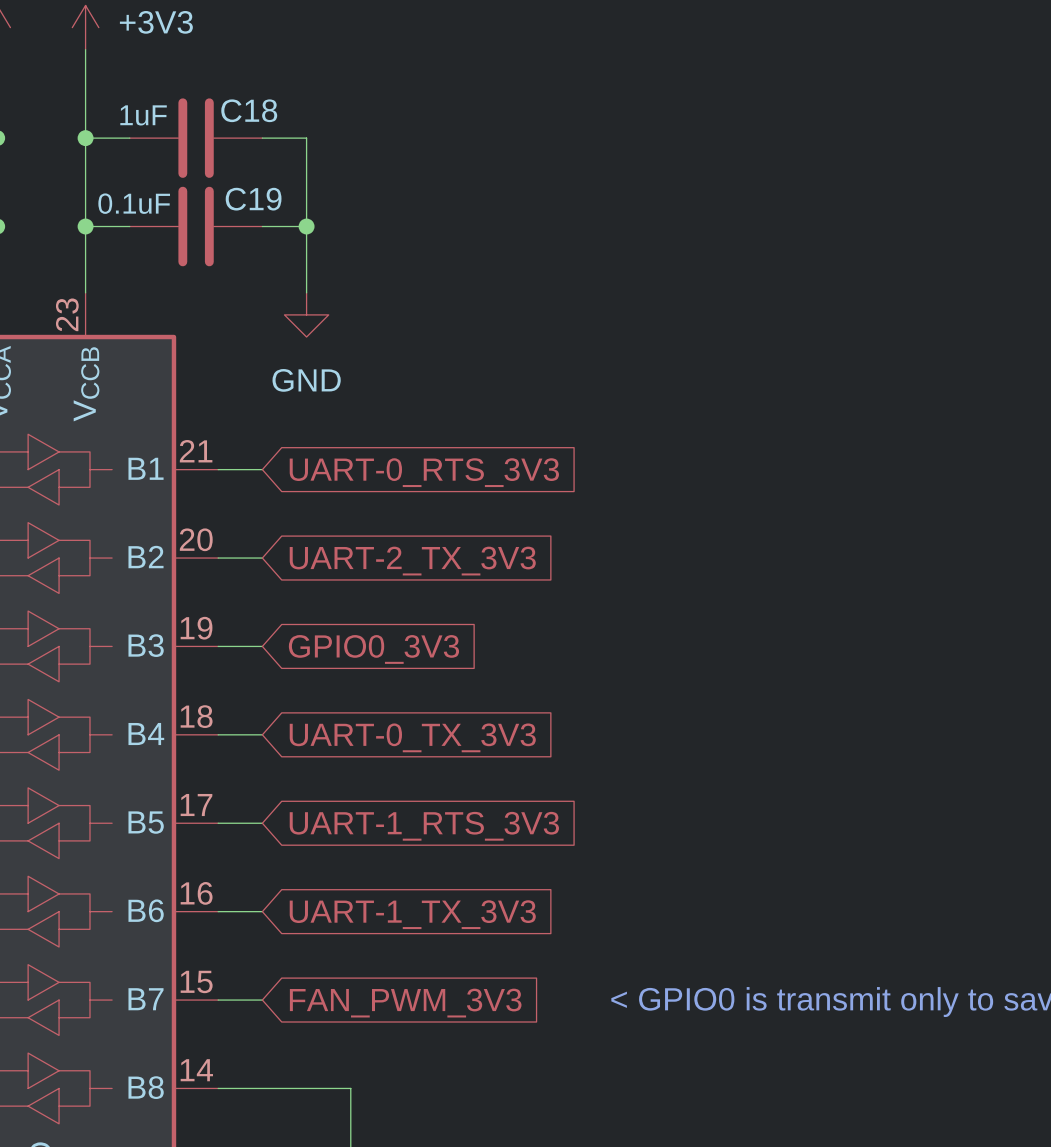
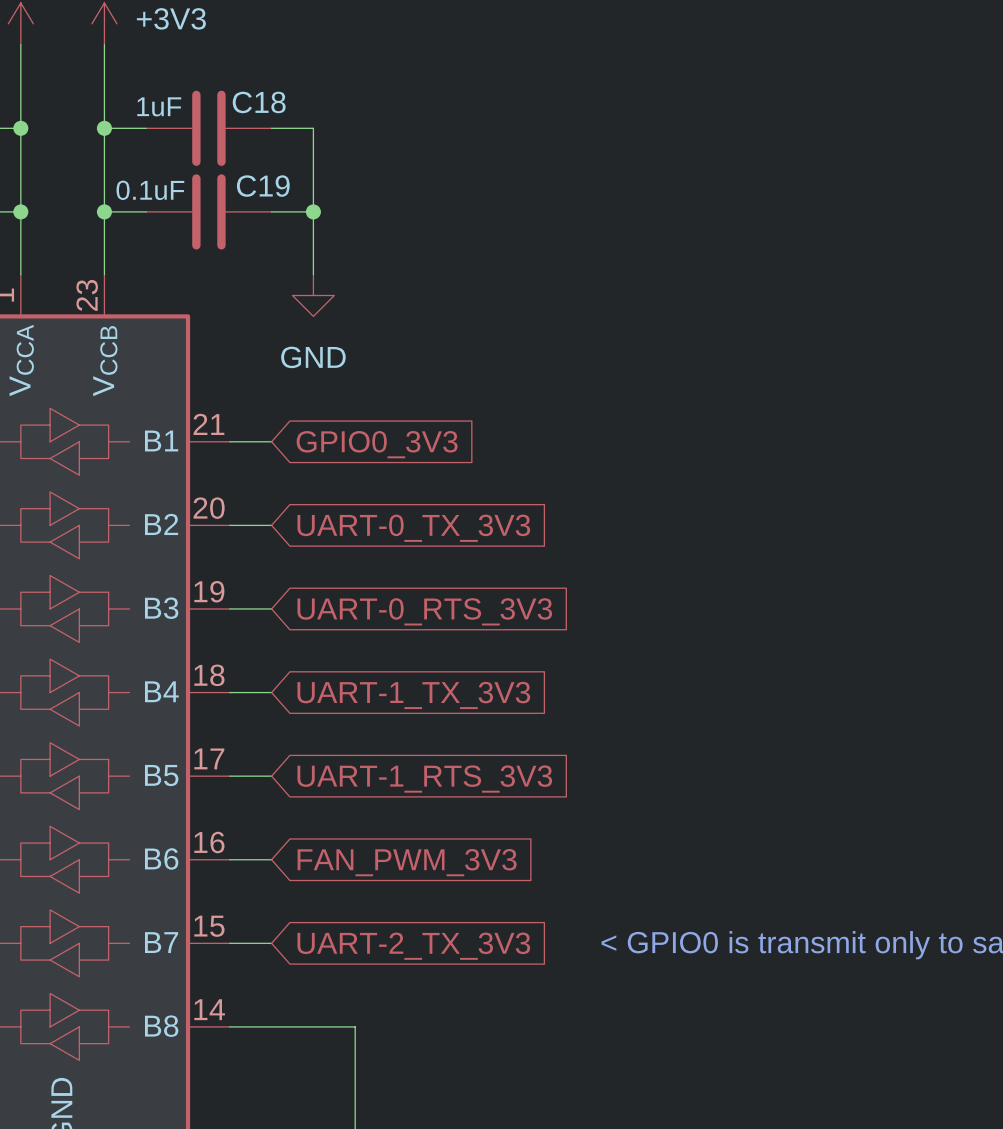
global label: UART-0_RTS_3V3 (424, 472) -> GPIO0_3V3 (377, 444)
global label: UART-2_TX_3V3 (412, 561) -> UART-0_TX_3V3 (413, 528)
global label: GPIO0_3V3 (373, 649) -> UART-0_RTS_3V3 (424, 611)
global label: UART-0_TX_3V3 (412, 737) -> UART-1_TX_3V3 (413, 695)
global label: UART-1_TX_3V3 (412, 914) -> FAN_PWM_3V3 (407, 862)
global label: FAN_PWM_3V3 (405, 1003) -> UART-2_TX_3V3 (413, 946)

